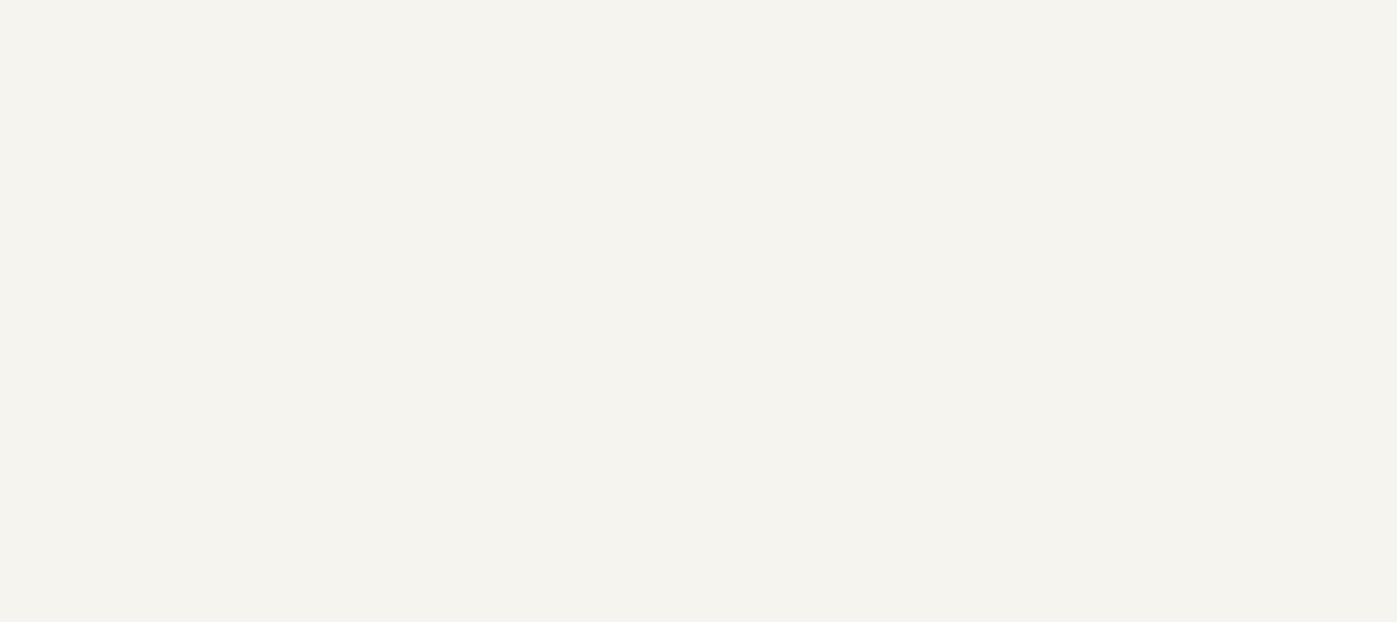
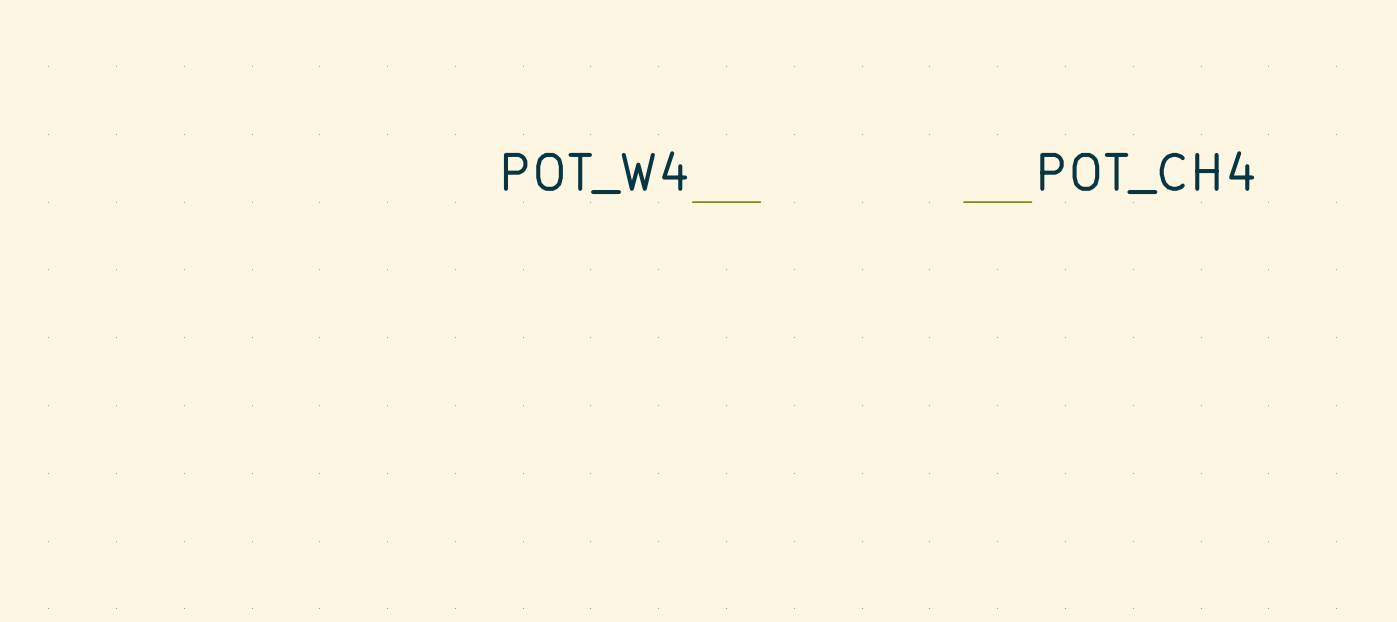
label: none -> POT_W4 (595, 172)
label: none -> POT_CH4 (1147, 172)
wire: none -> (692, 202) (760, 202)
wire: none -> (963, 202) (1031, 202)

